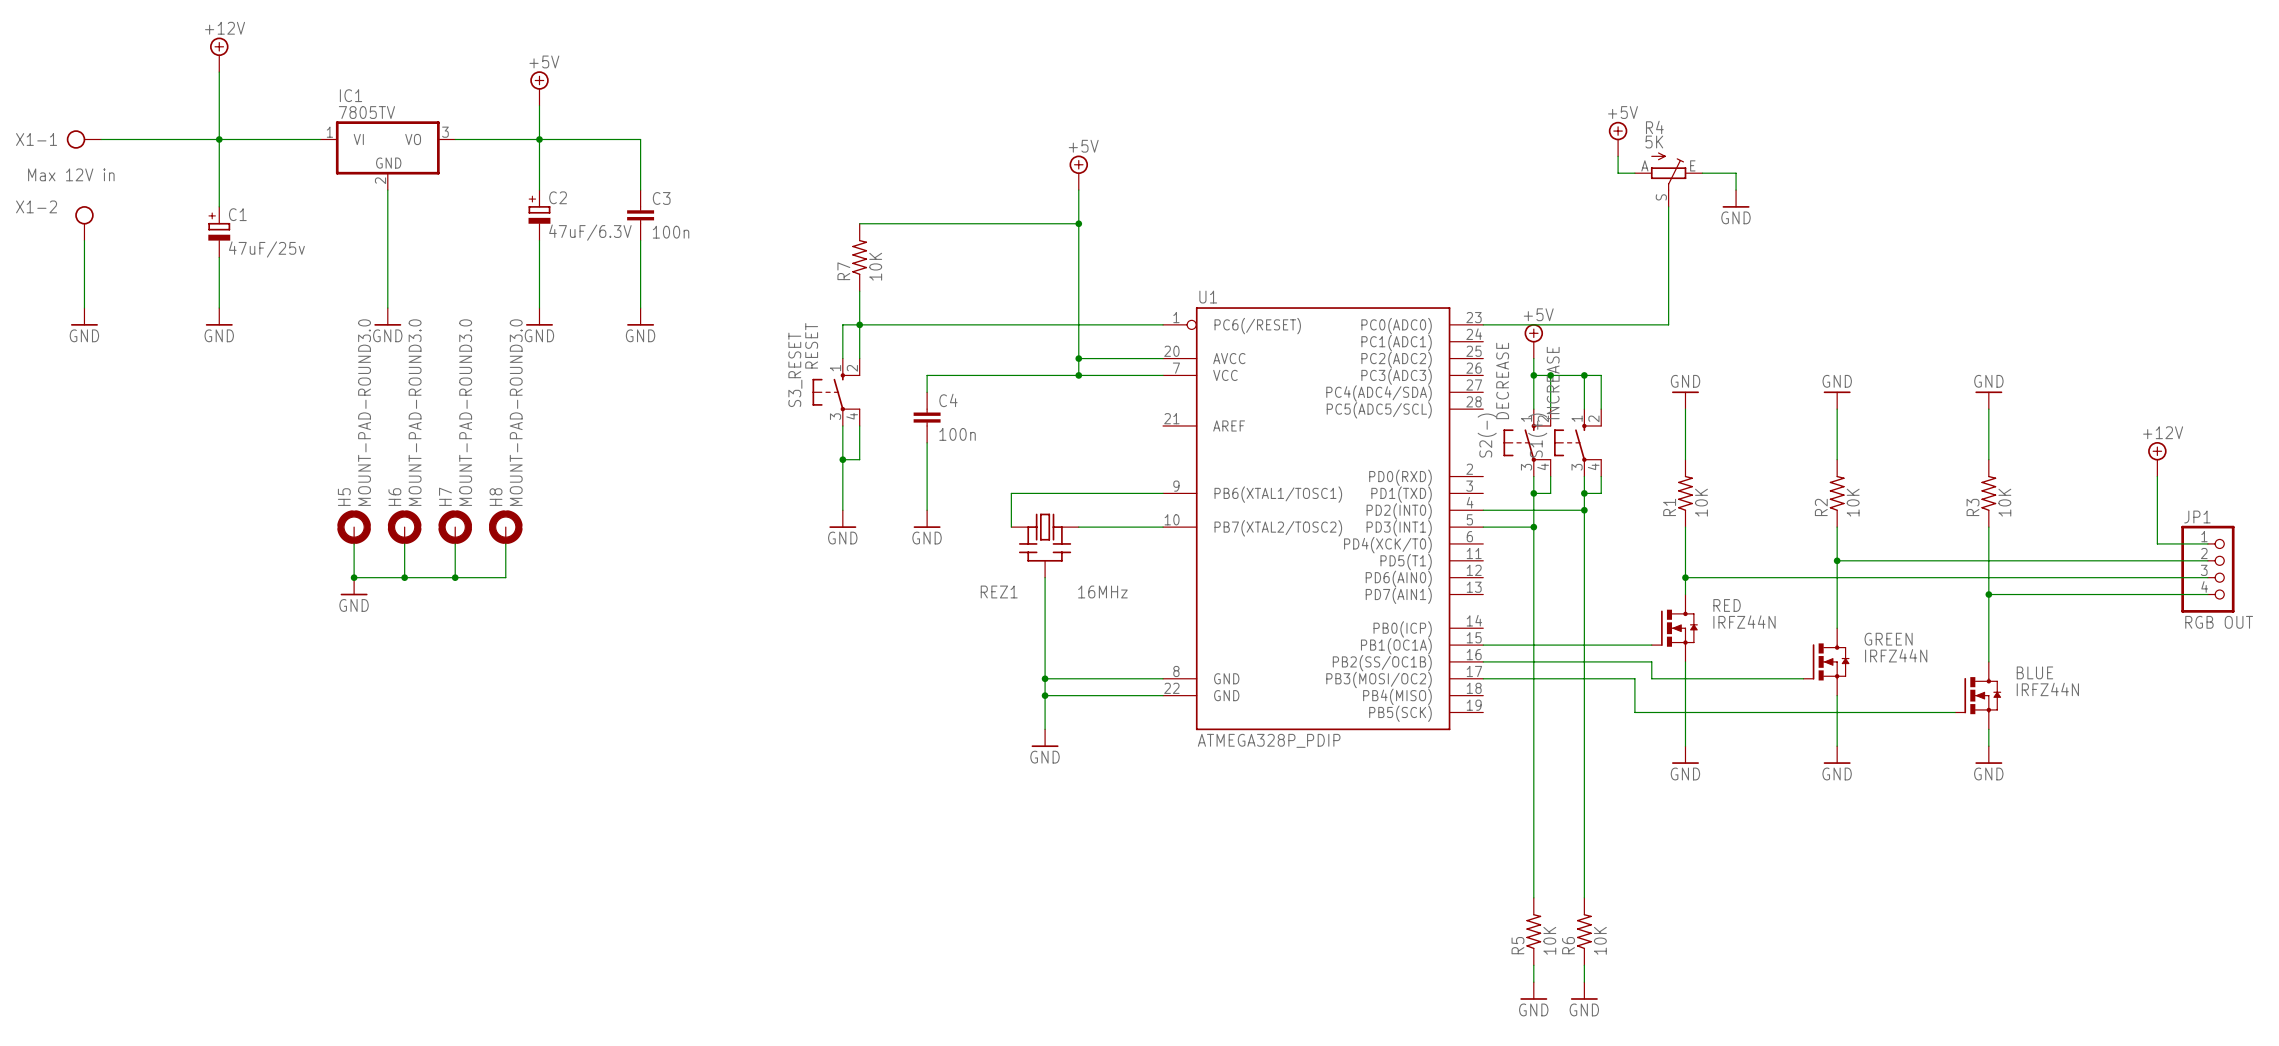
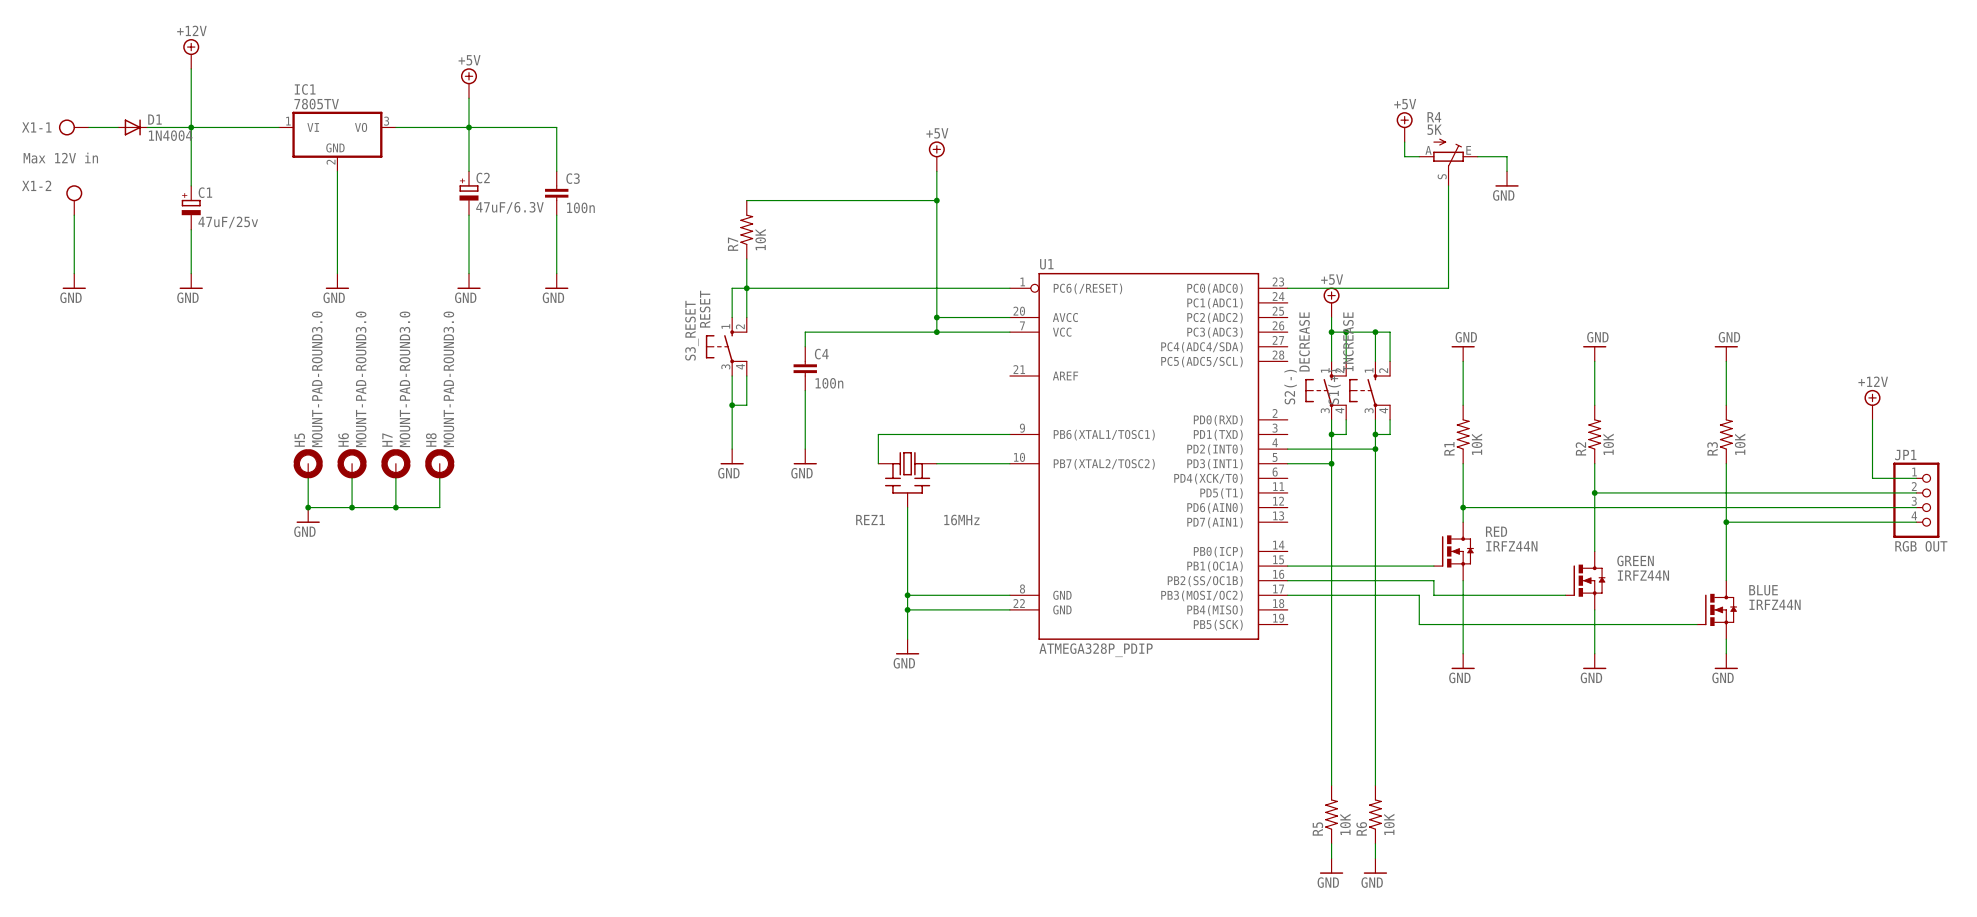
D1: none -> 1N4004 (132, 127)

